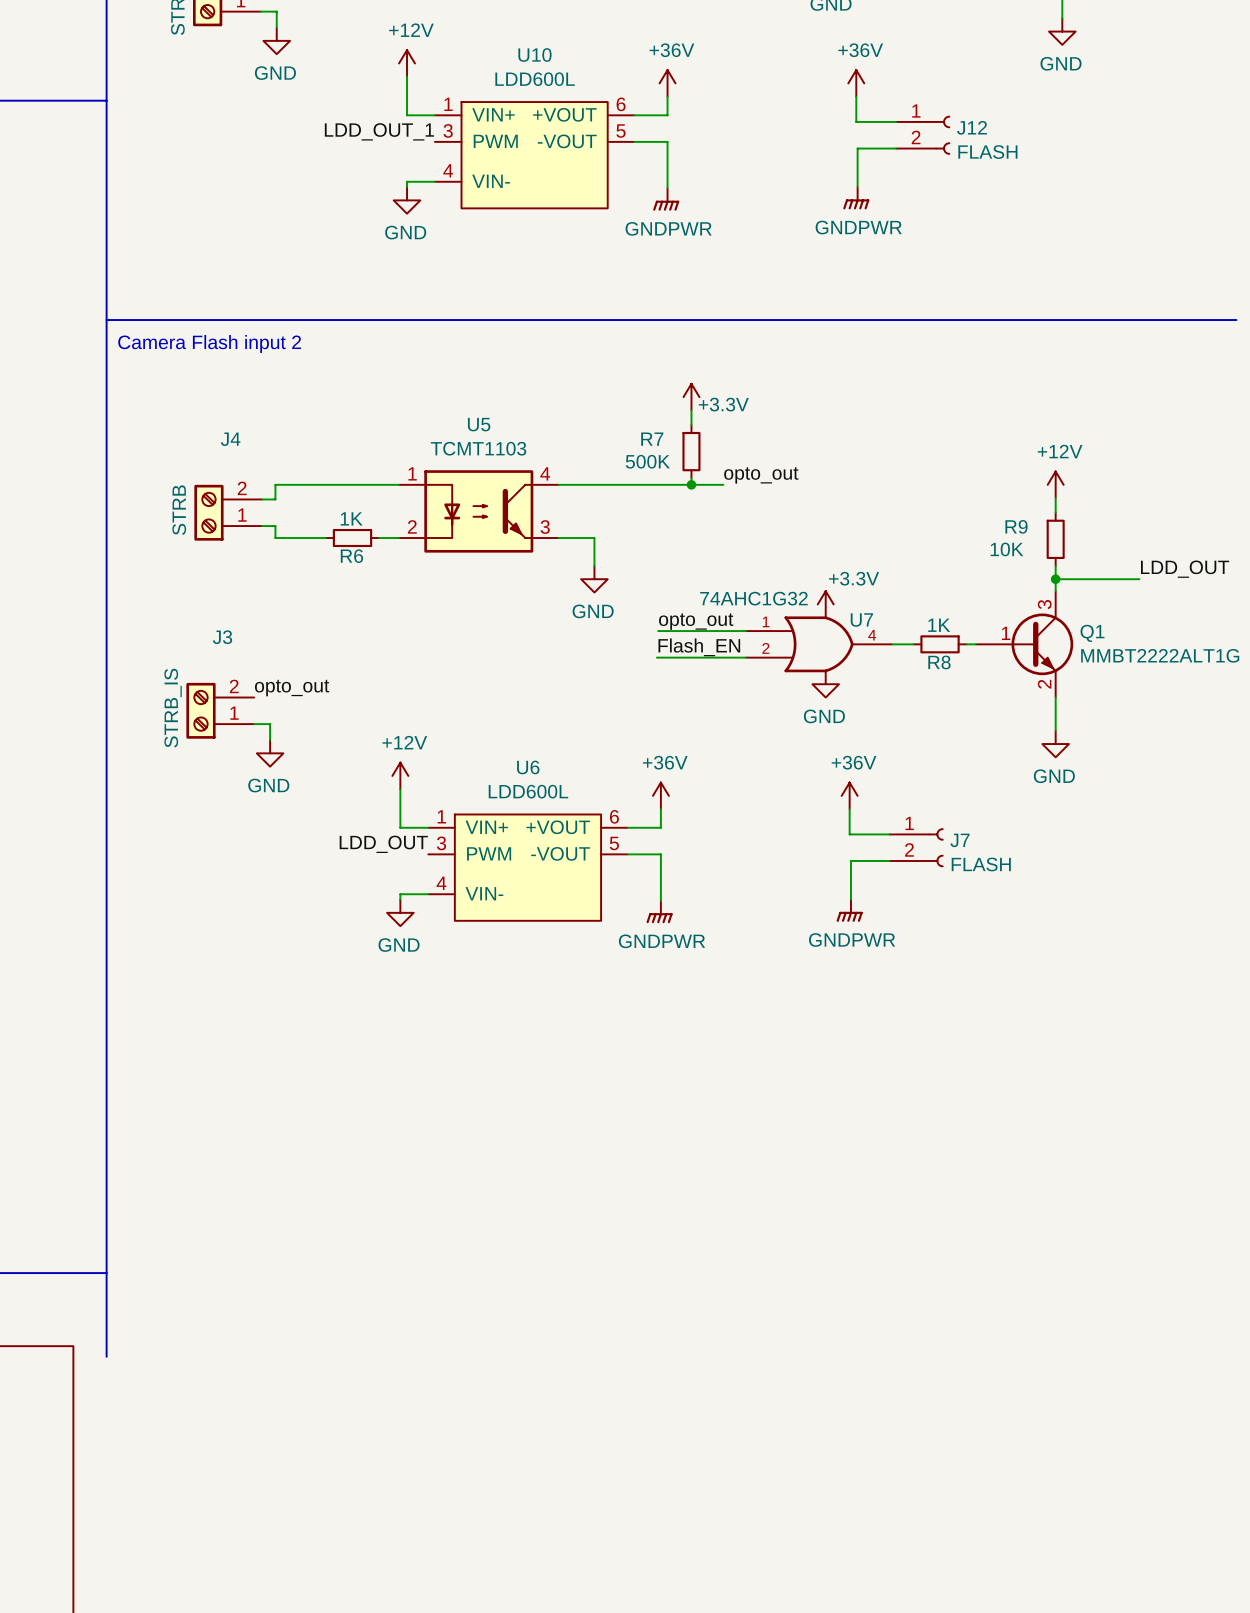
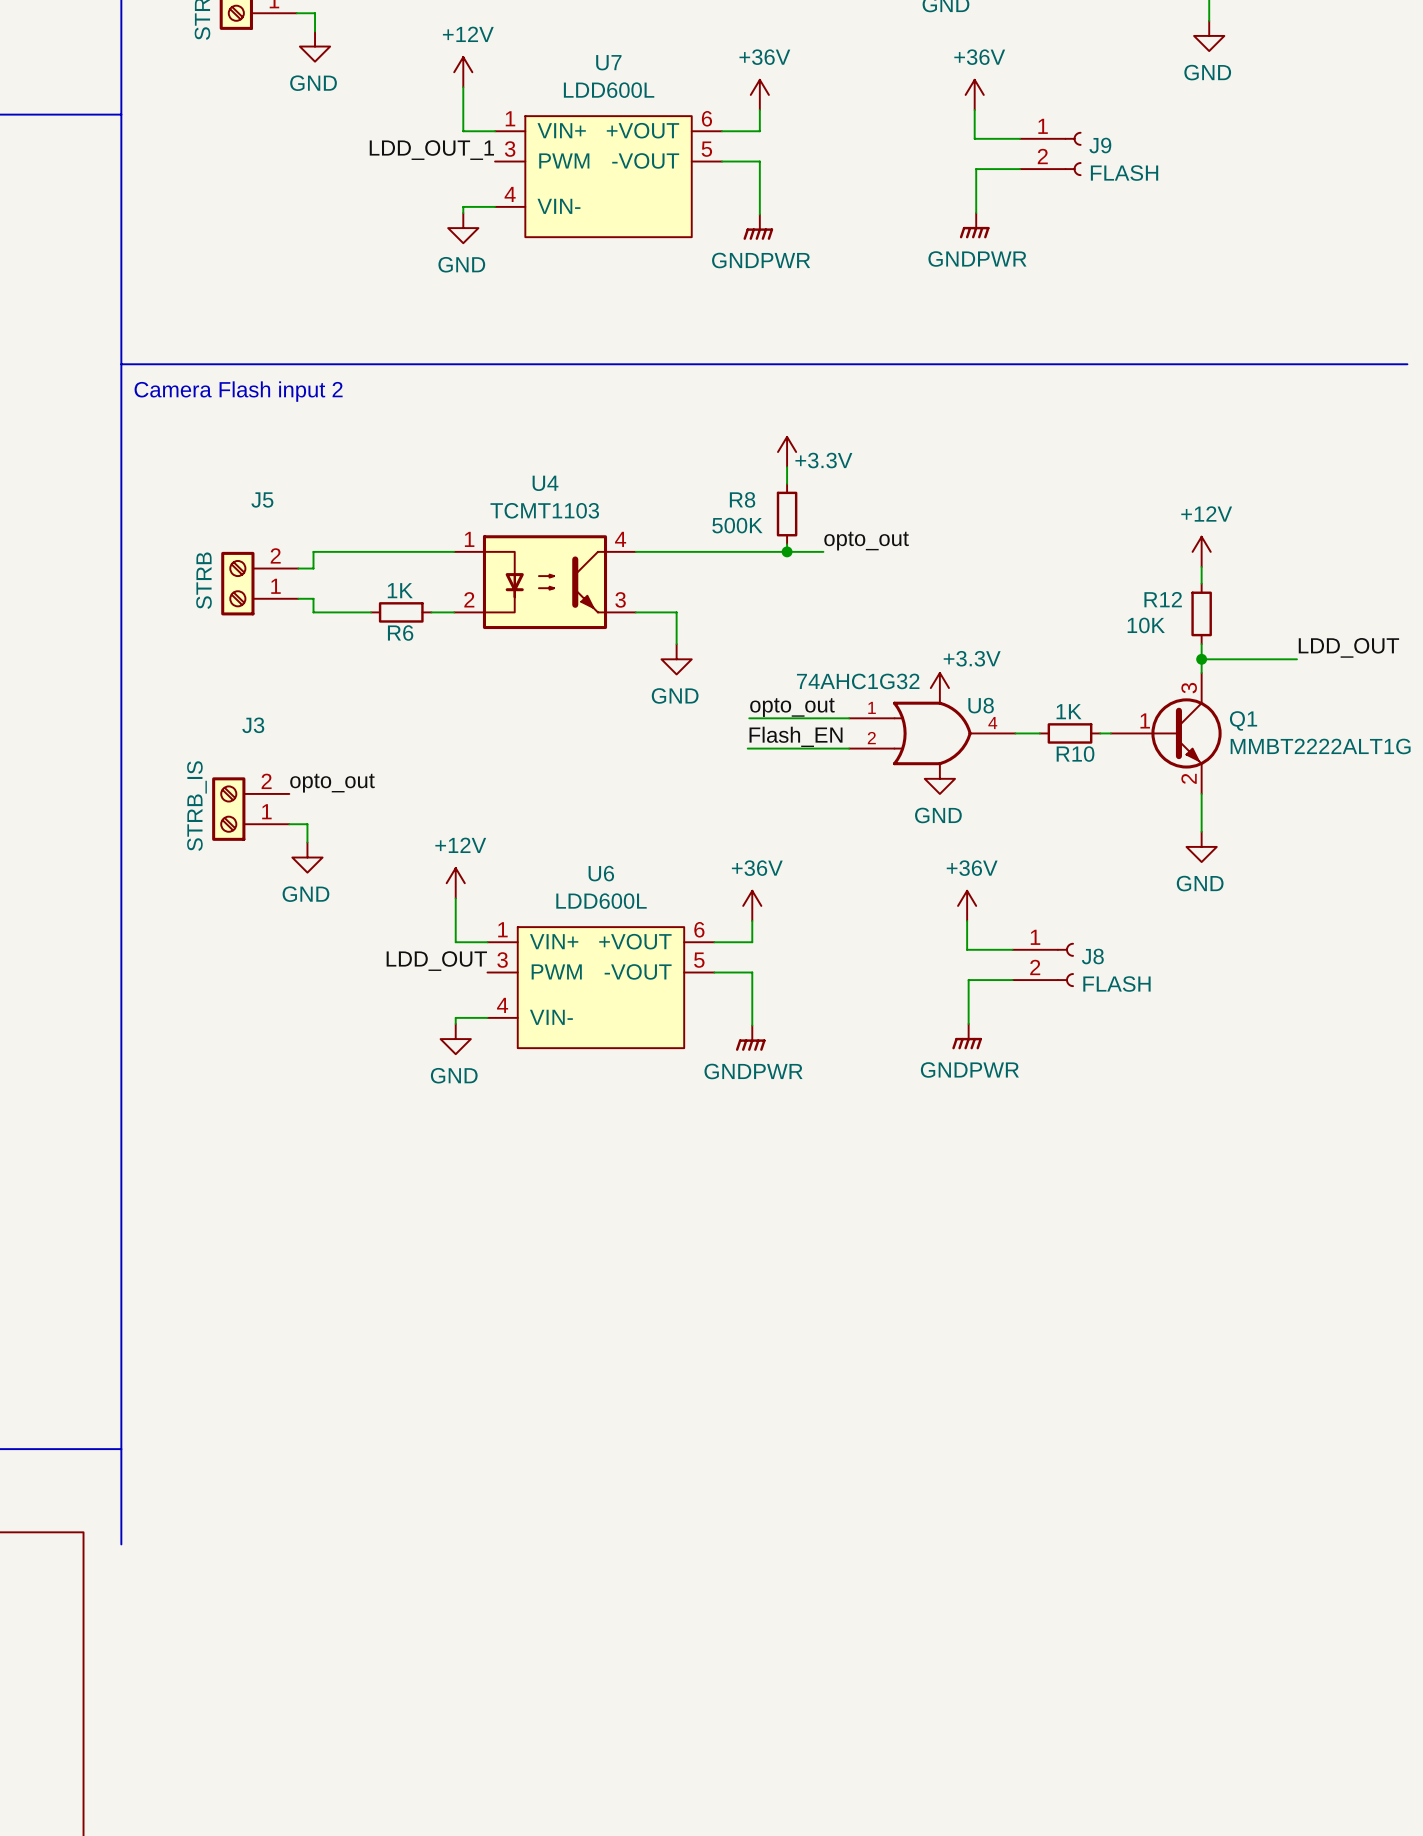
U10 name: U10 (534, 55) -> U7 (608, 62)
J12 name: J12 (972, 127) -> J9 (1100, 145)
U5 name: U5 (479, 424) -> U4 (545, 483)
J4 name: J4 (230, 439) -> J5 (262, 499)
R7 name: R7 (652, 439) -> R8 (742, 499)
R9 name: R9 (1016, 526) -> R12 (1163, 599)
U7 name: U7 (861, 620) -> U8 (981, 705)
R8 name: R8 (939, 662) -> R10 (1075, 754)
J7 name: J7 (960, 840) -> J8 (1092, 956)

